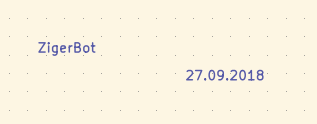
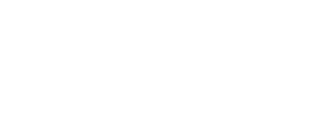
text: ZigerBot (66, 48) -> none
text: 27.09.2018 (224, 75) -> none

